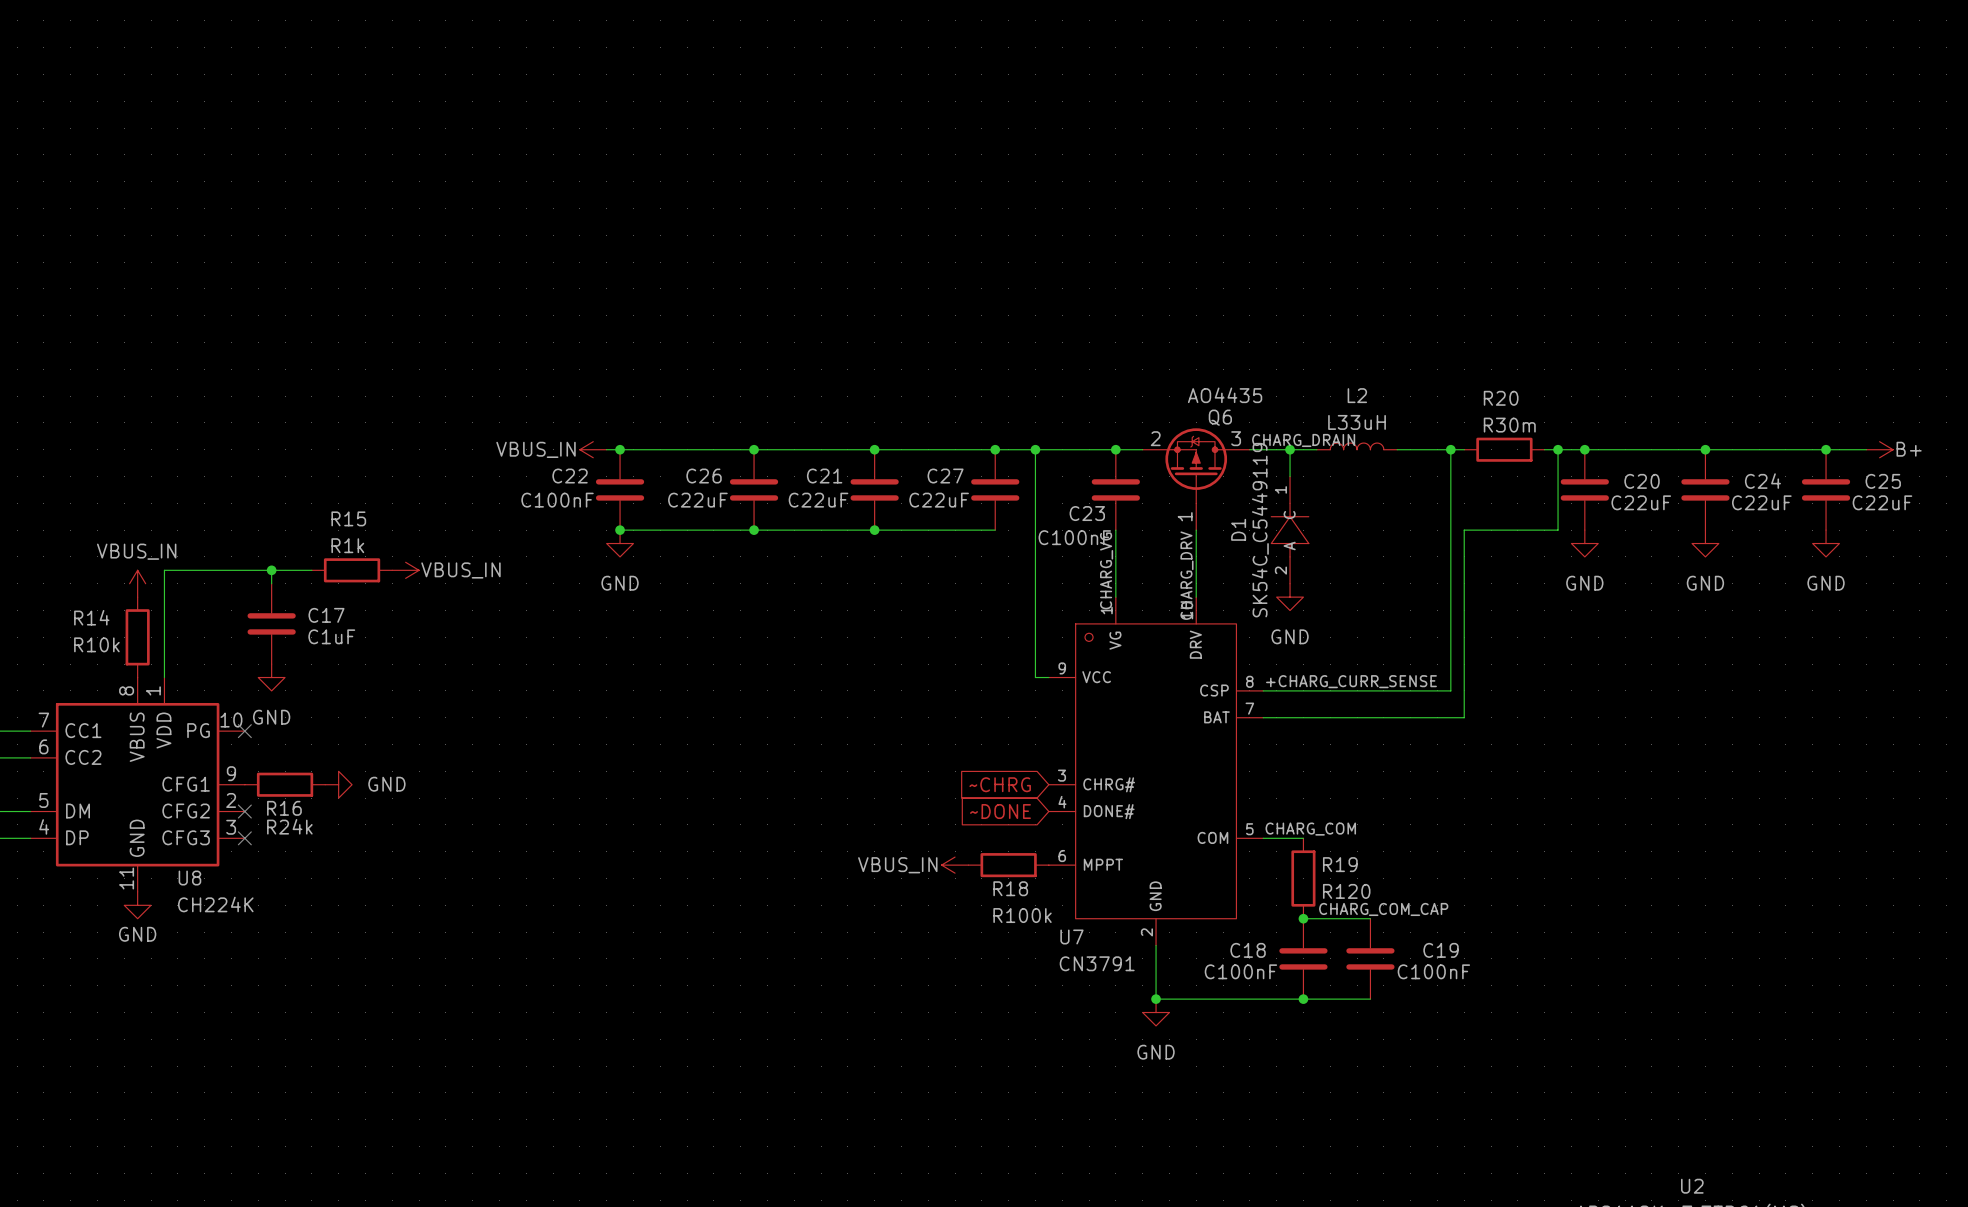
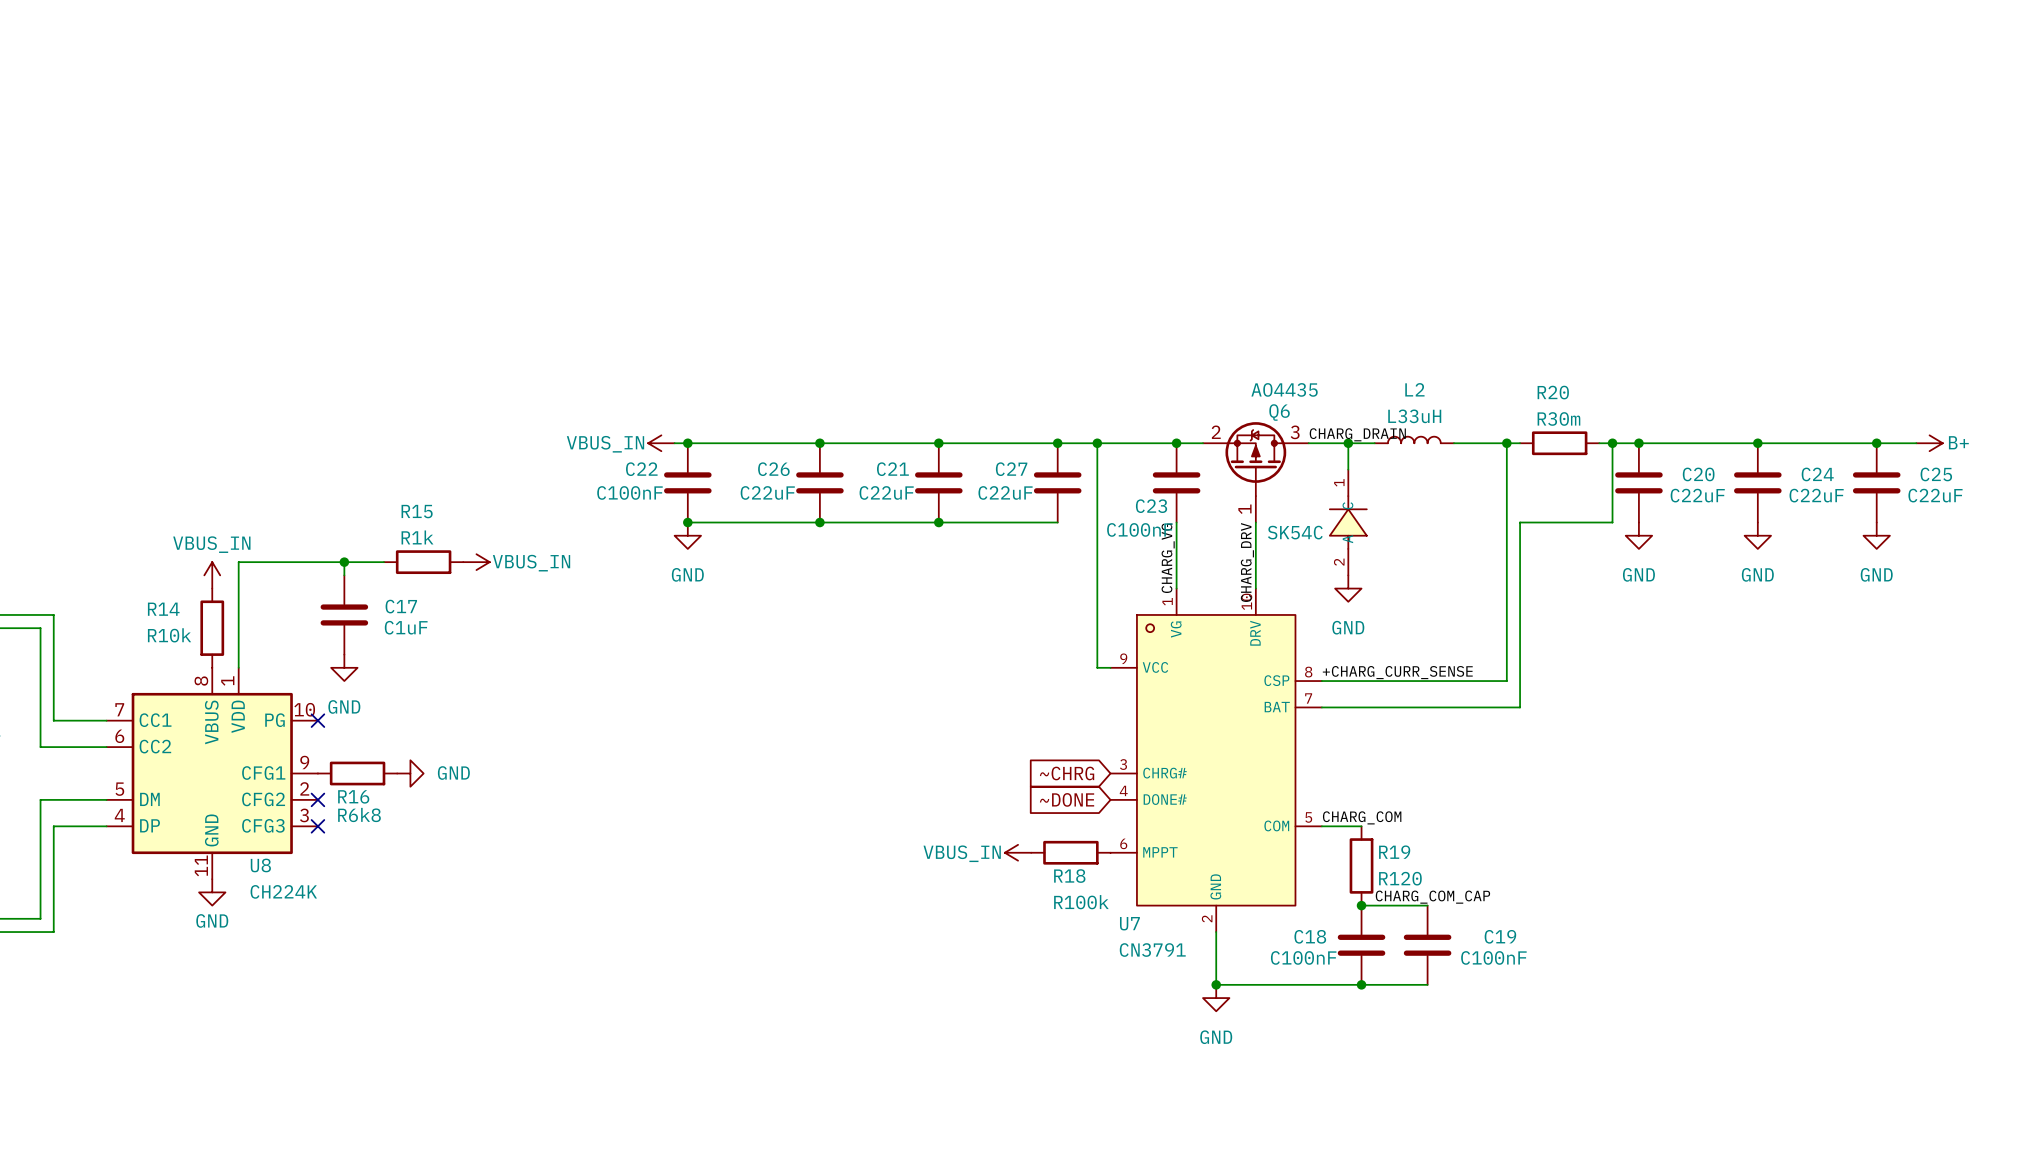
D1 name: D1 (1238, 529) -> none
D1 value: SK54C_C5449119 (1260, 530) -> SK54C (1295, 532)
R16 value: R24k (289, 826) -> R6k8 (359, 814)

